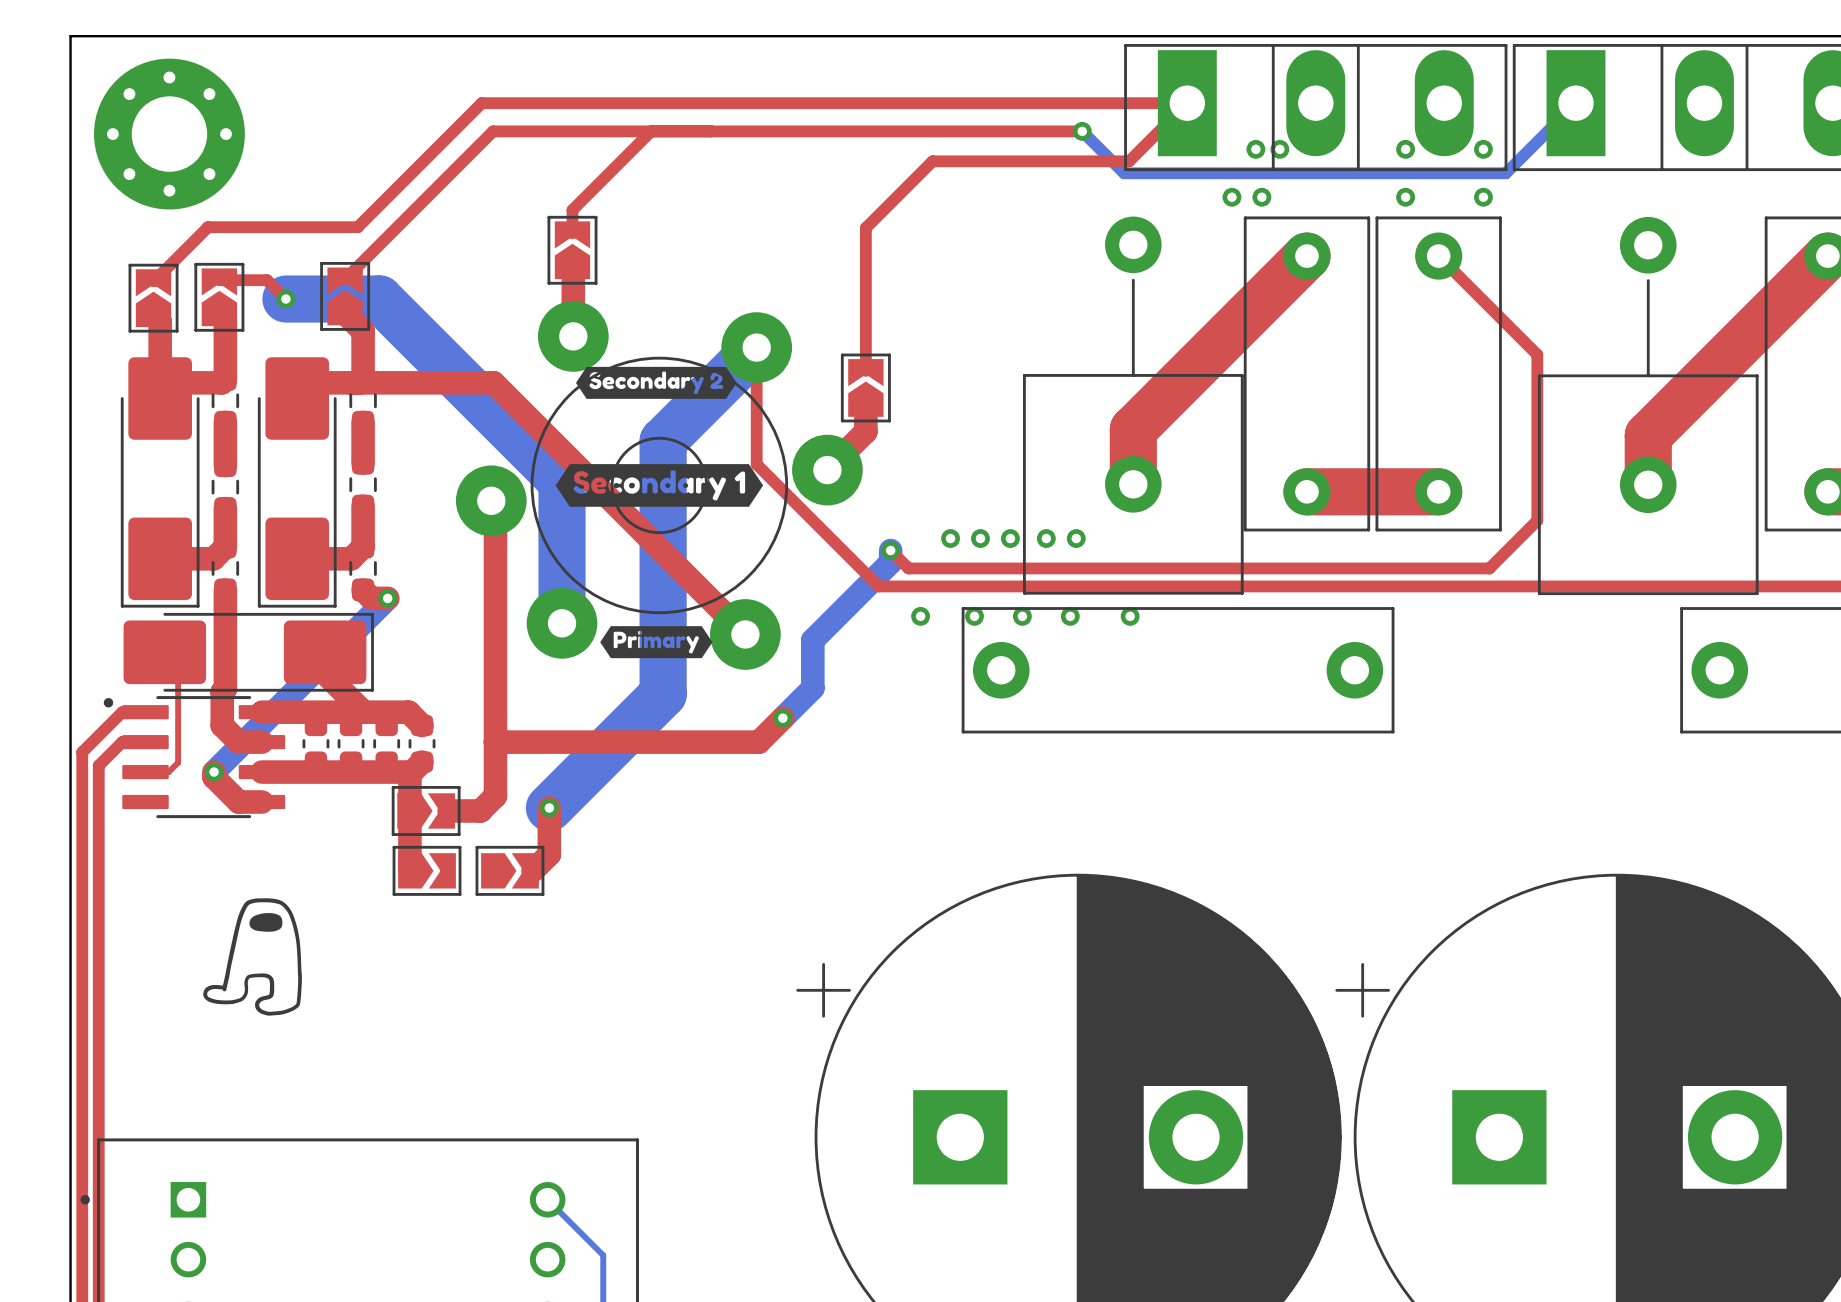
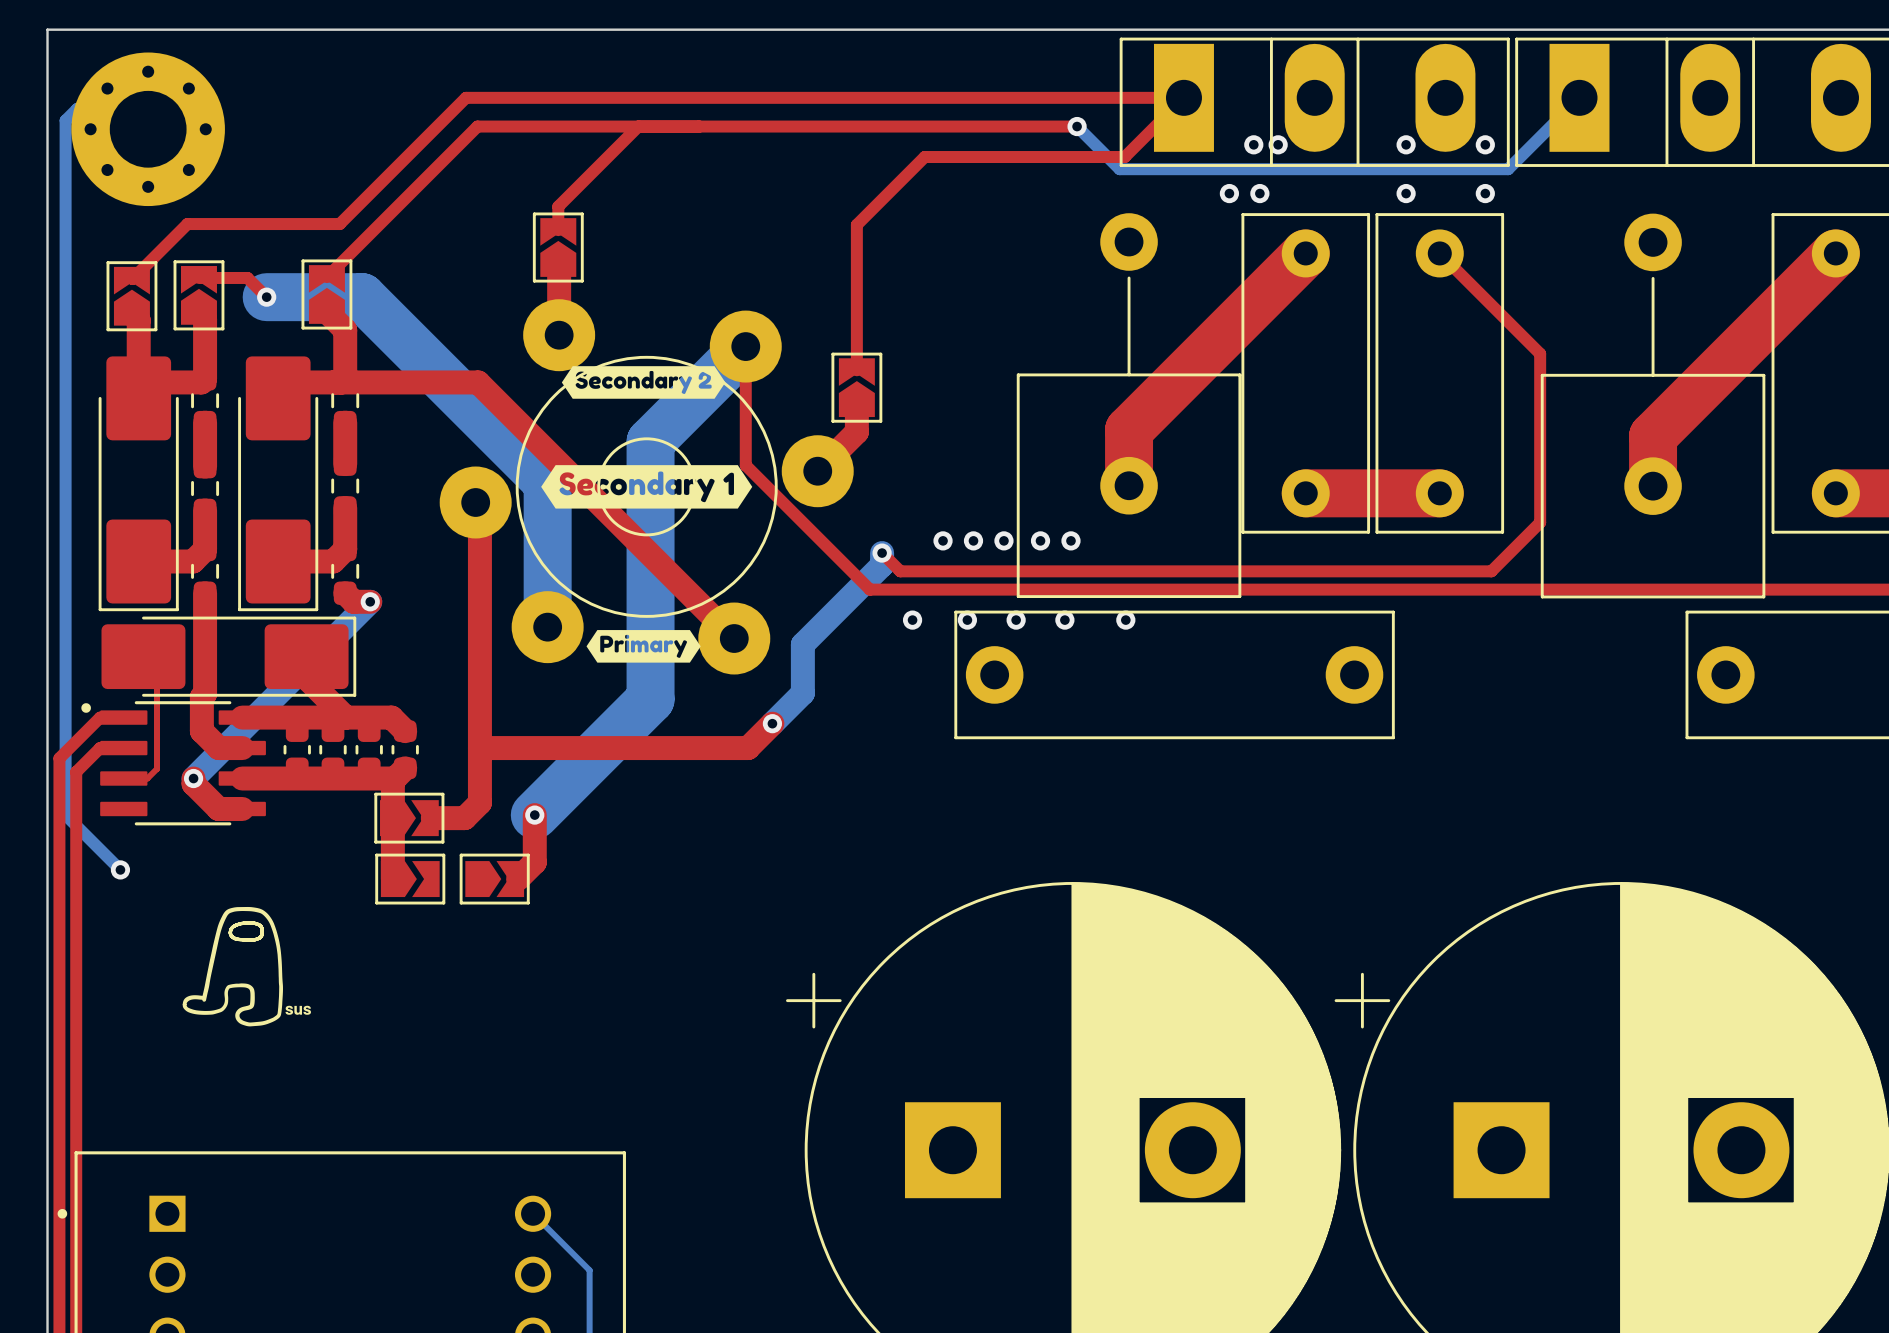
bottom track: none -> (148, 129) (127, 108) (77, 108) (65, 120) (65, 815) (120, 869)
via: none -> (120, 869)
drawing: [249, 913, 283, 932] -> none
line: none -> (237, 924) (248, 922) (258, 924)
line: none -> (236, 939) (248, 940)
line: none -> (257, 938) (256, 939)
line: none -> (251, 940) (249, 940)
text: none -> sus (298, 1010)

